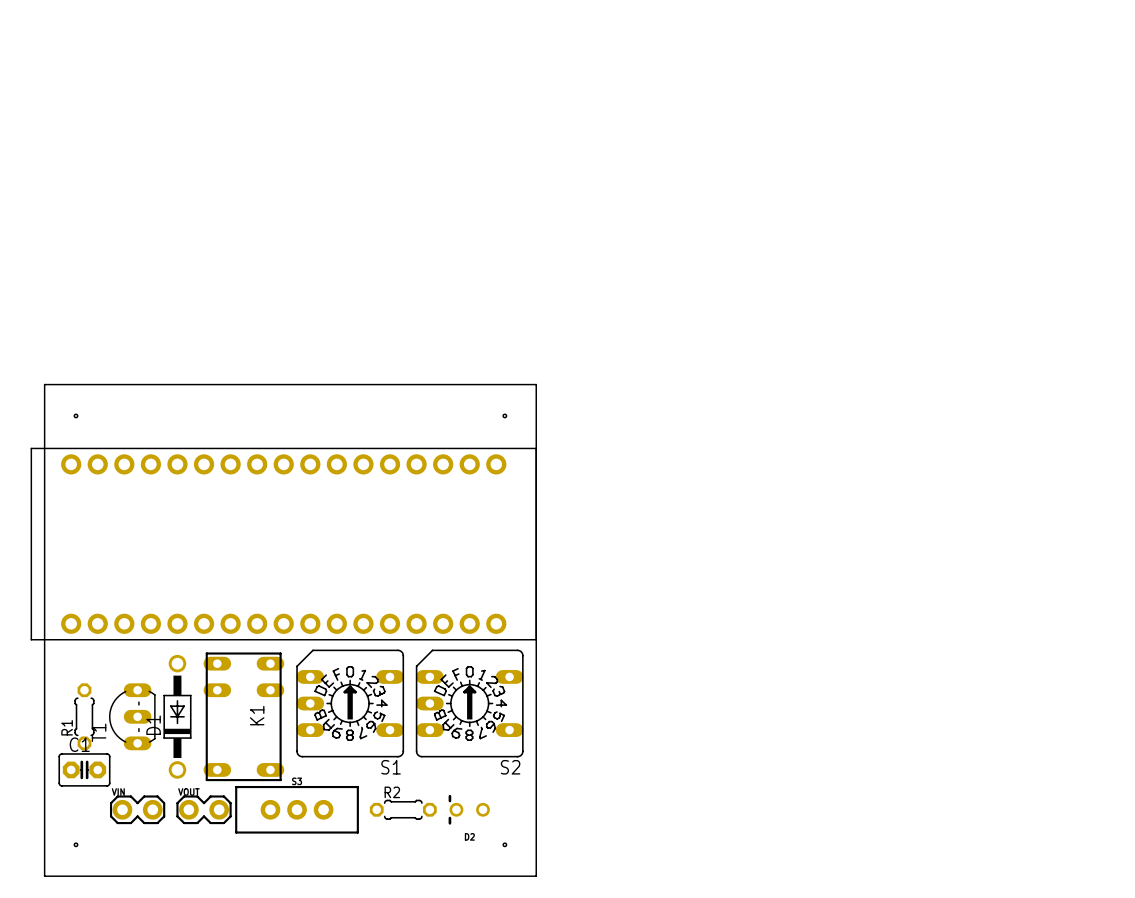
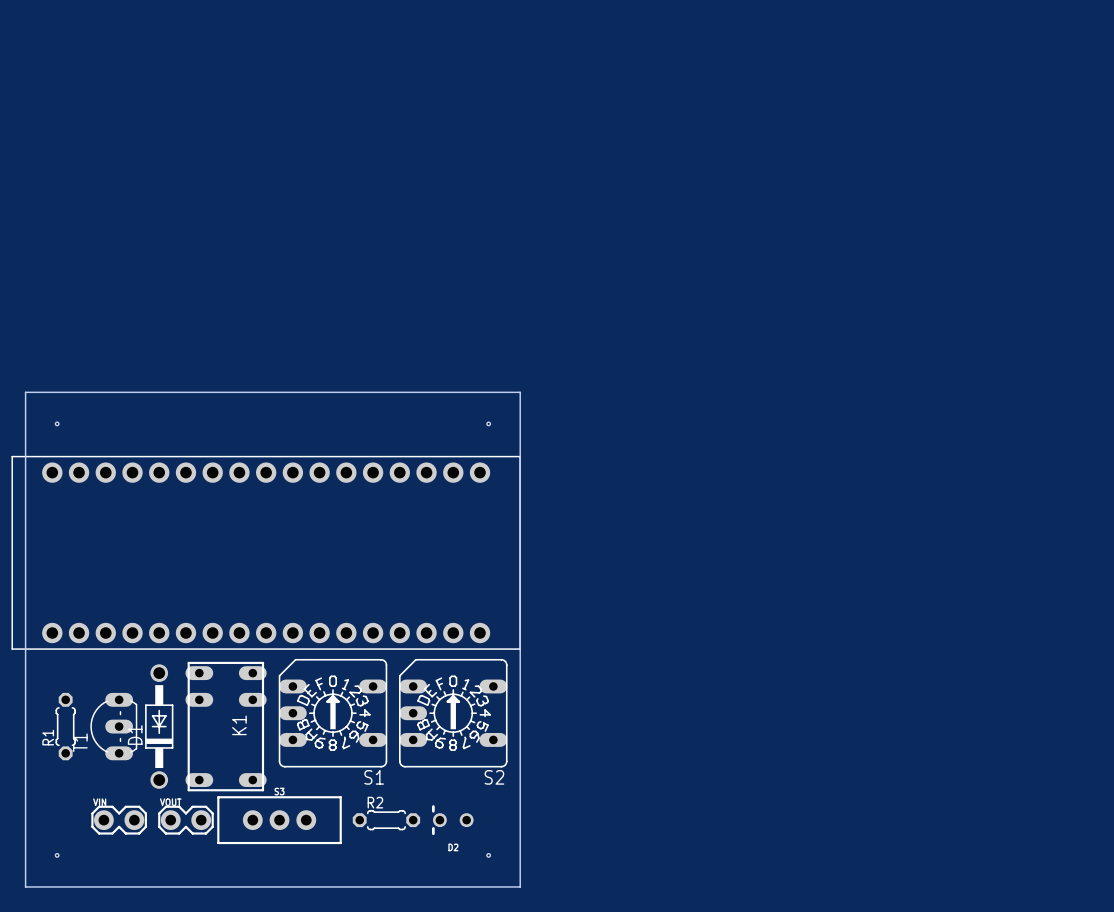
C1: (84, 769) -> none

